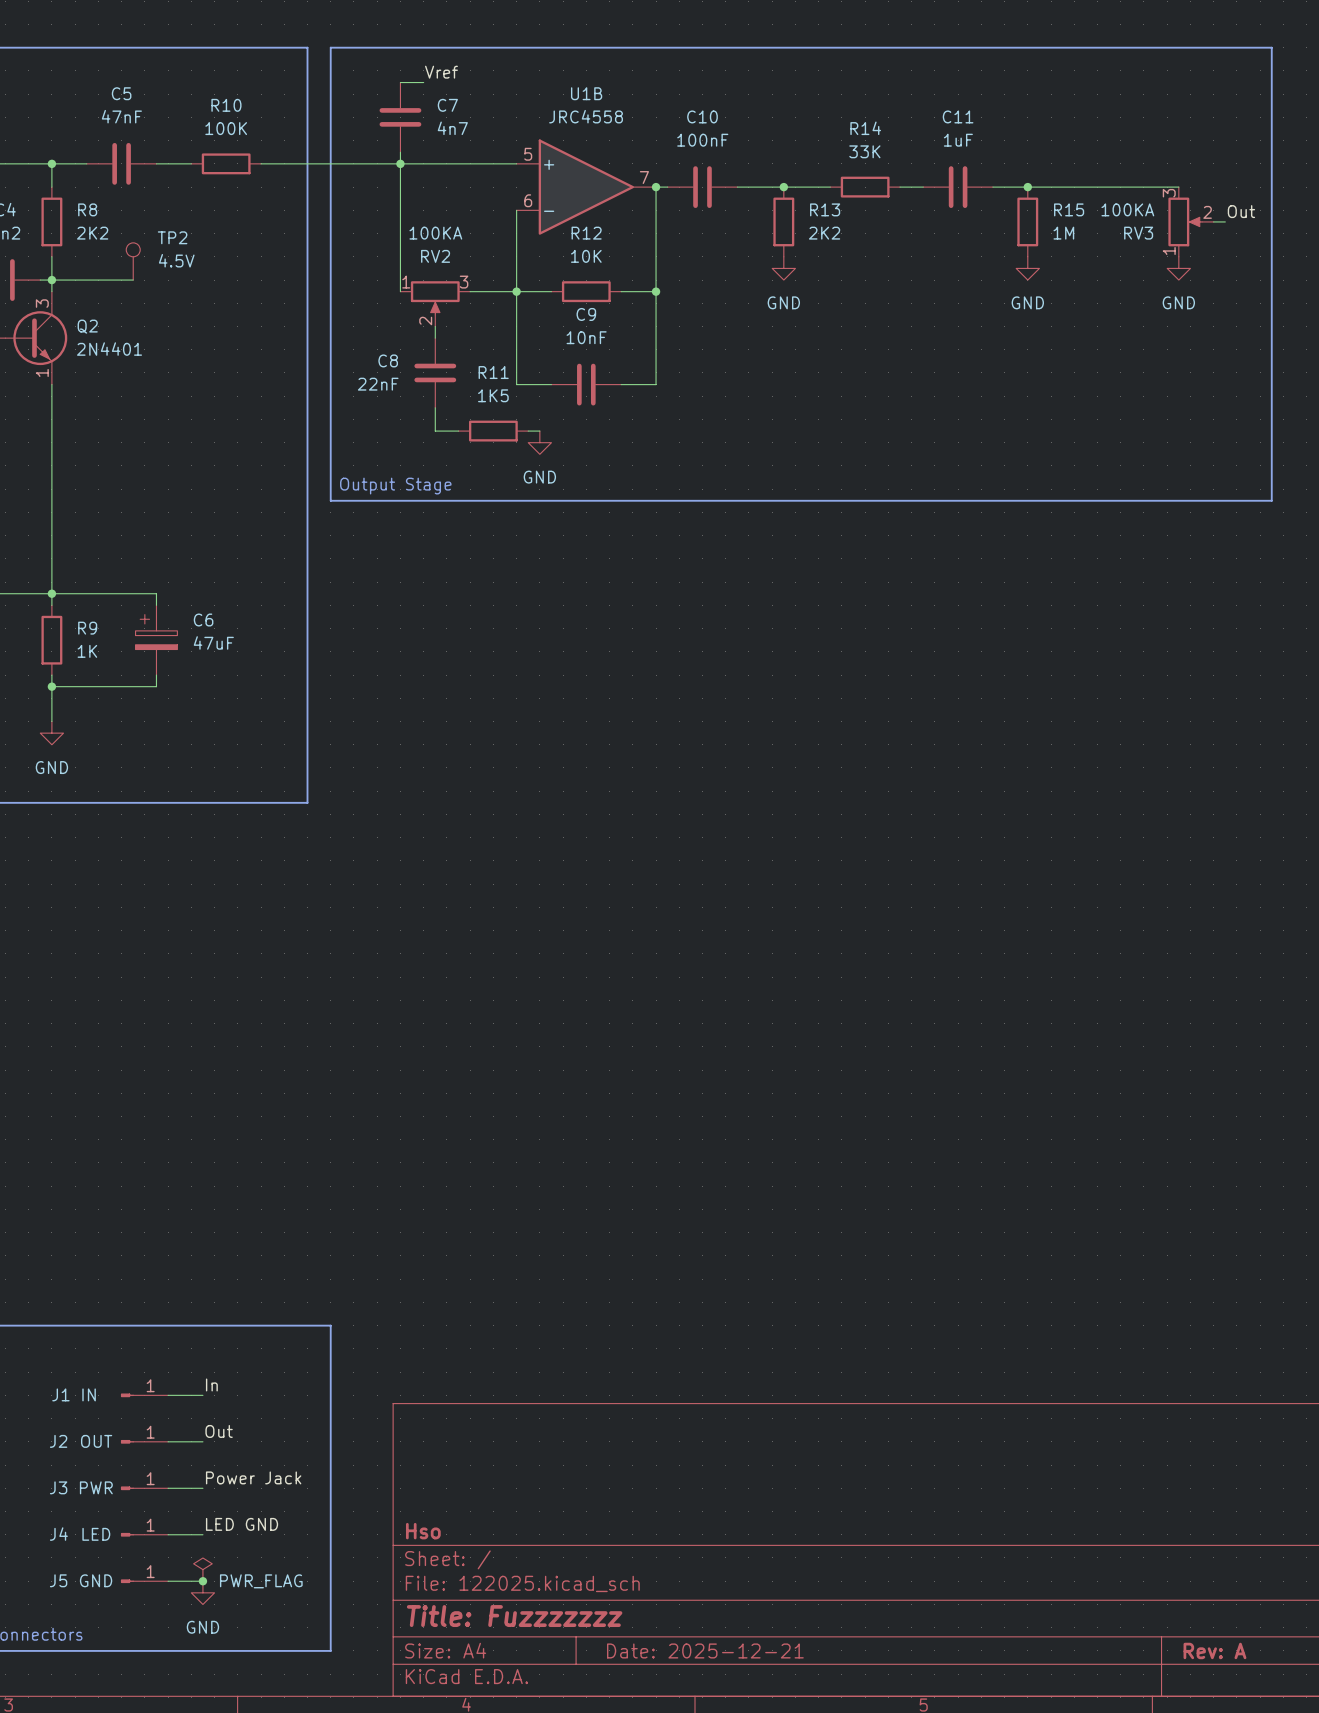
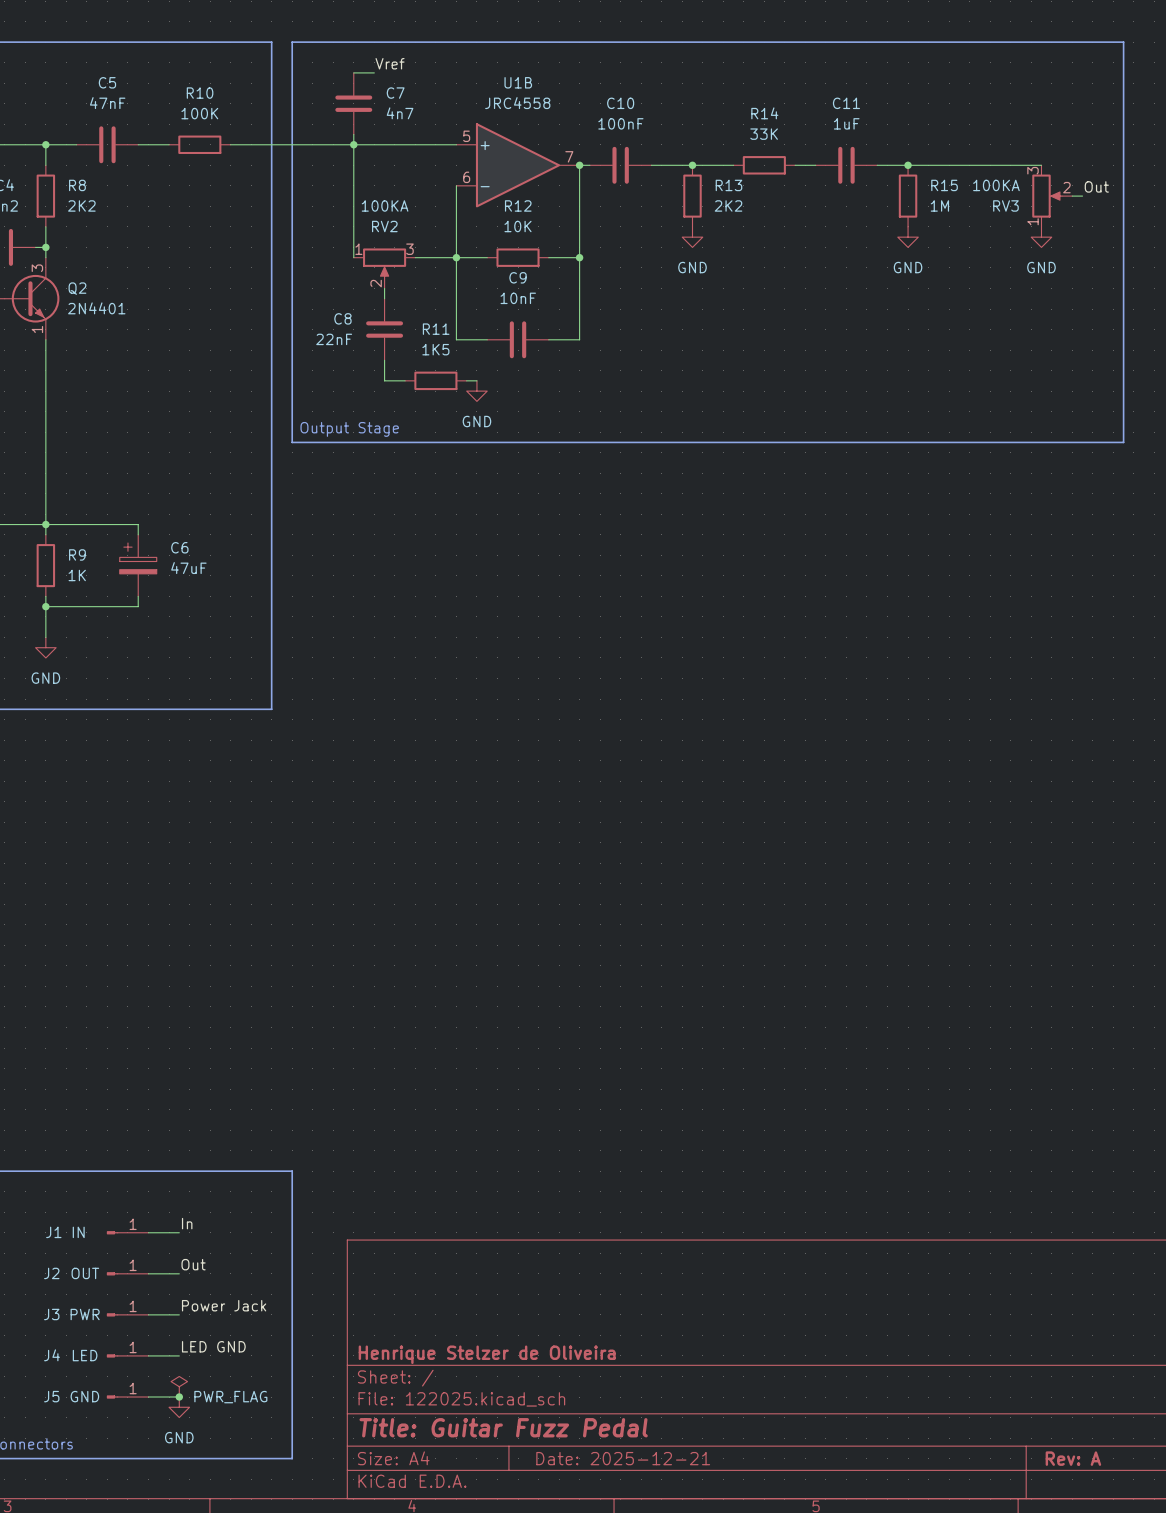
TP2: 4.5V (133, 261) -> none
wire: (51, 280) (133, 280) -> none
title block: Hso (423, 1531) -> Henrique Stelzer de Oliveira (487, 1354)
title block: Title: Fuzzzzzzz (514, 1616) -> Title: Guitar Fuzz Pedal (503, 1427)

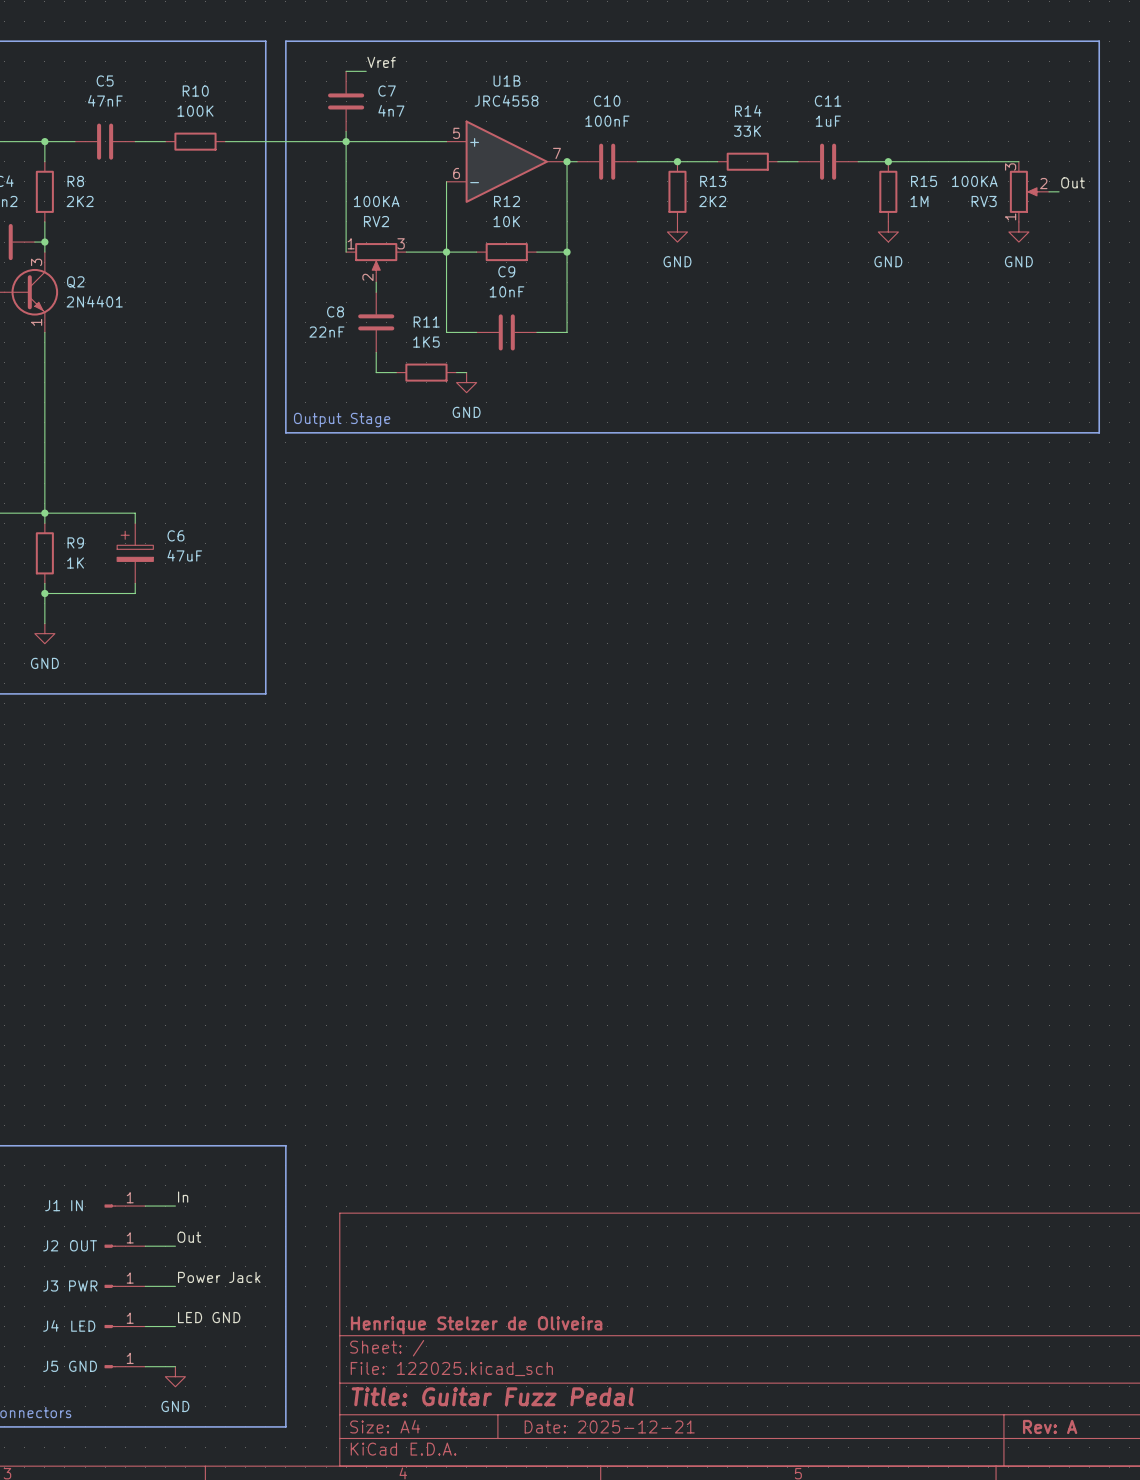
power symbol: PWR_FLAG (179, 1386) -> none
junction: (179, 1397) -> none

